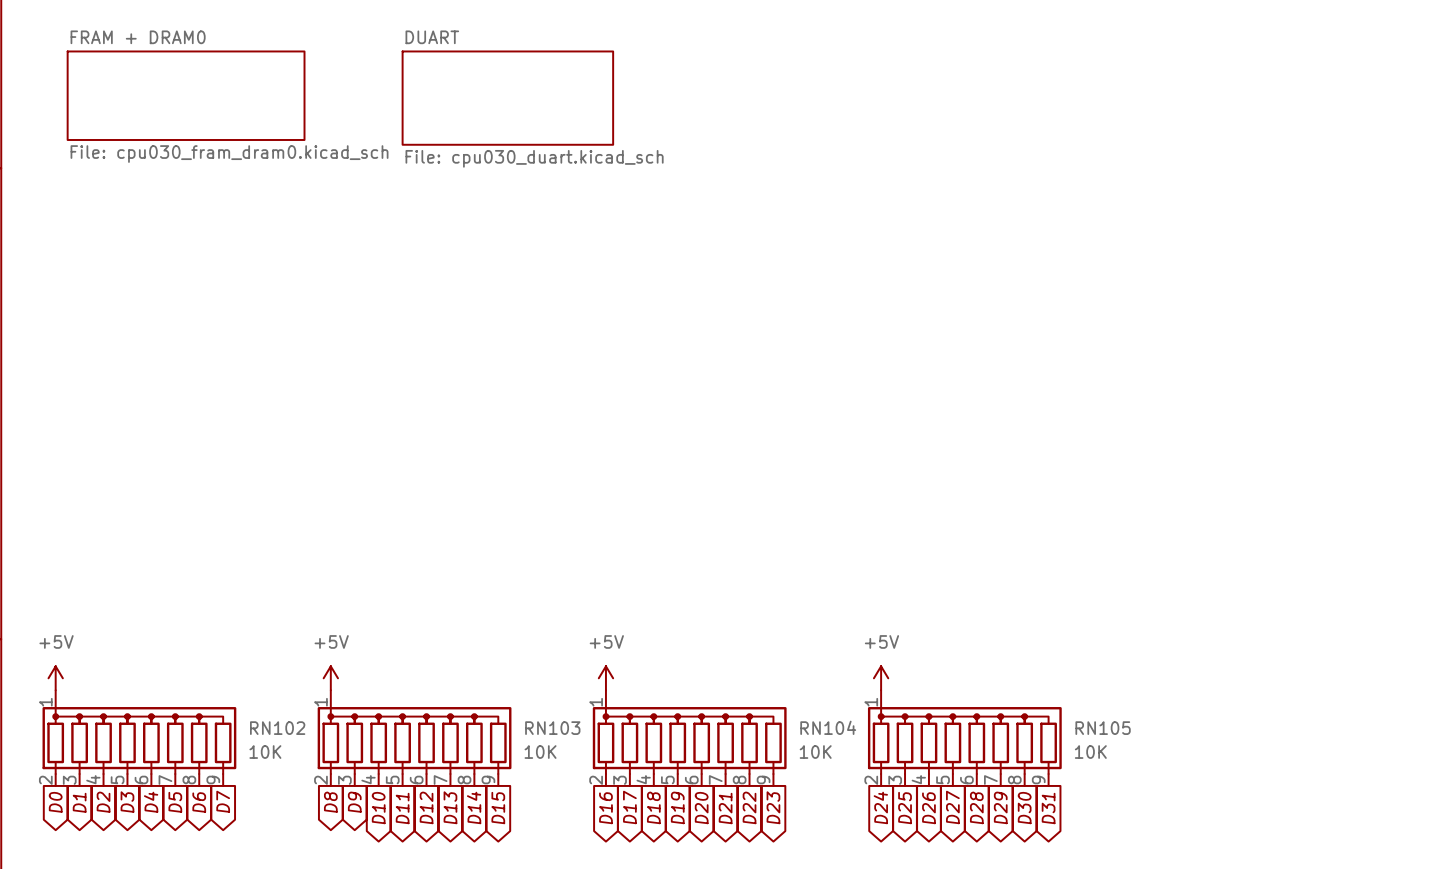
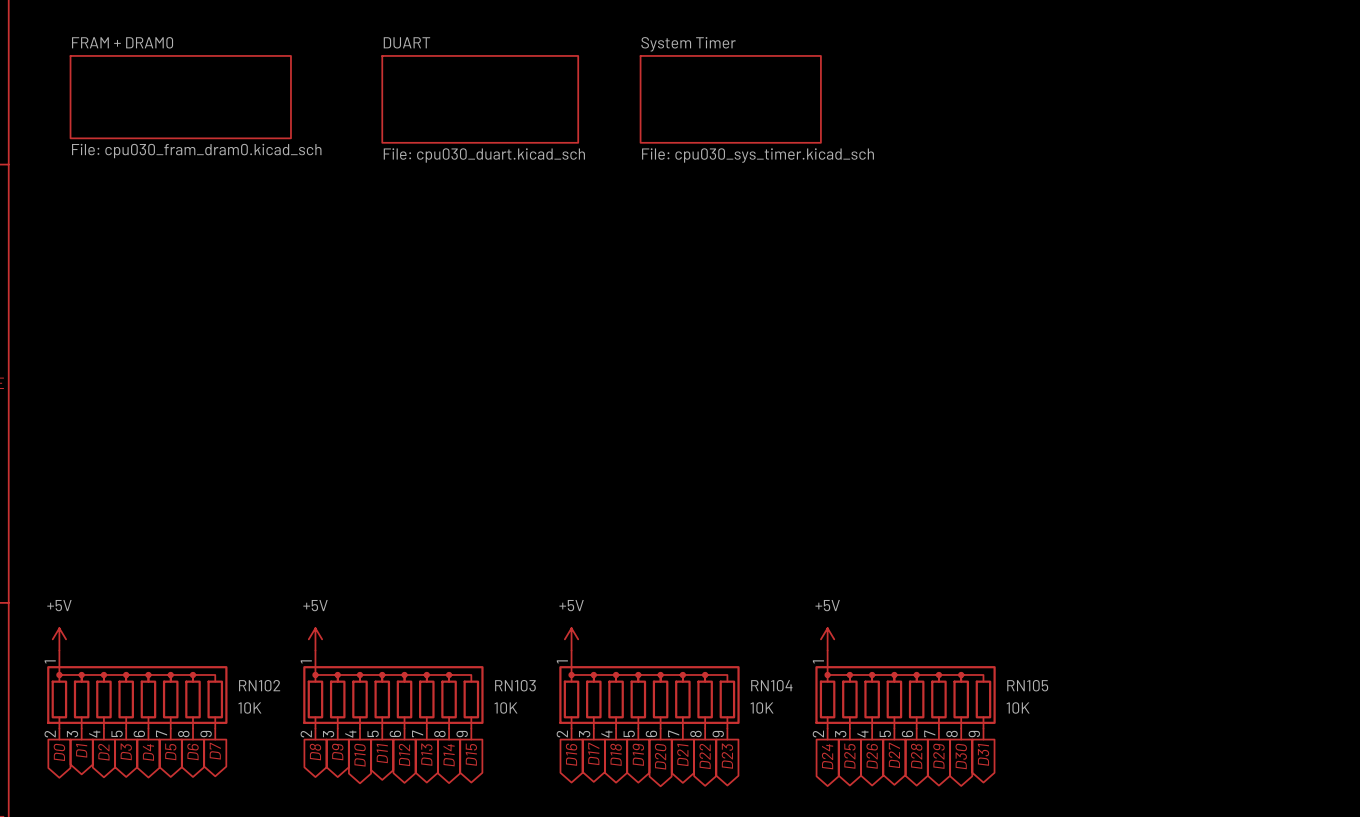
sheet System Timer: none -> File: cpu030_sys_timer.kicad_sch (730, 99)

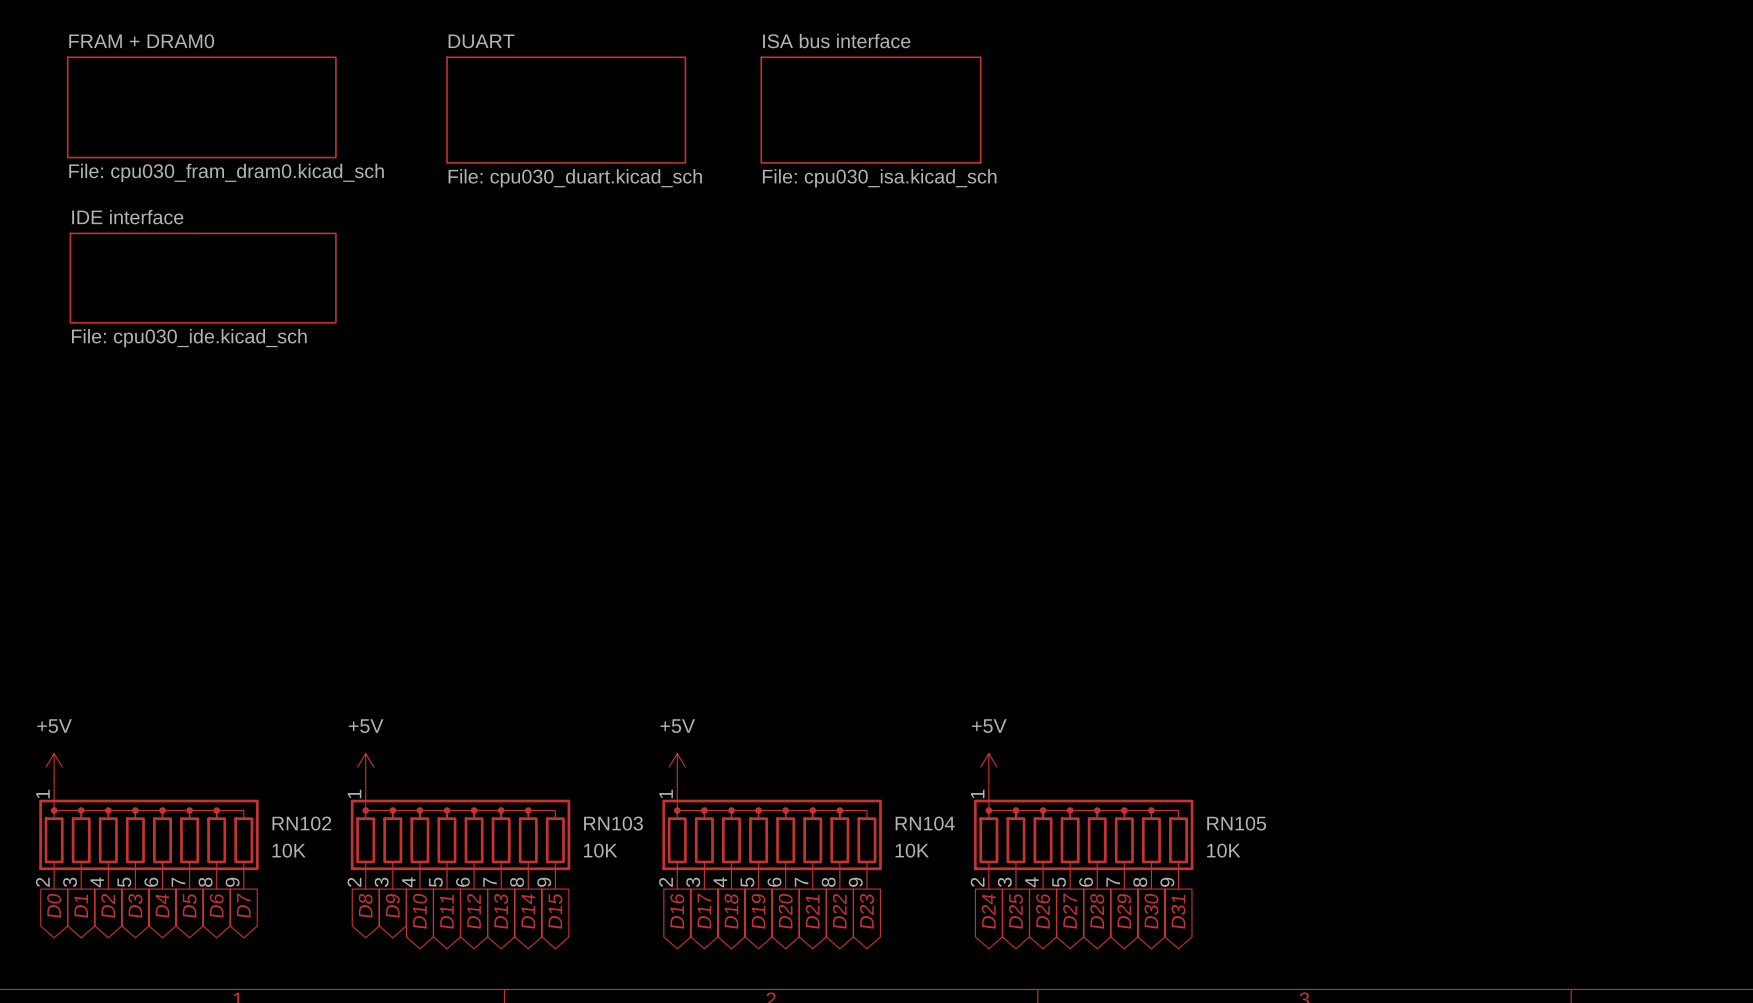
sheet System Timer name: System Timer (688, 44) -> ISA bus interface (836, 41)
sheet System Timer value: File: cpu030_sys_timer.kicad_sch (758, 155) -> File: cpu030_isa.kicad_sch (879, 178)
sheet IDE interface: none -> File: cpu030_ide.kicad_sch (203, 278)

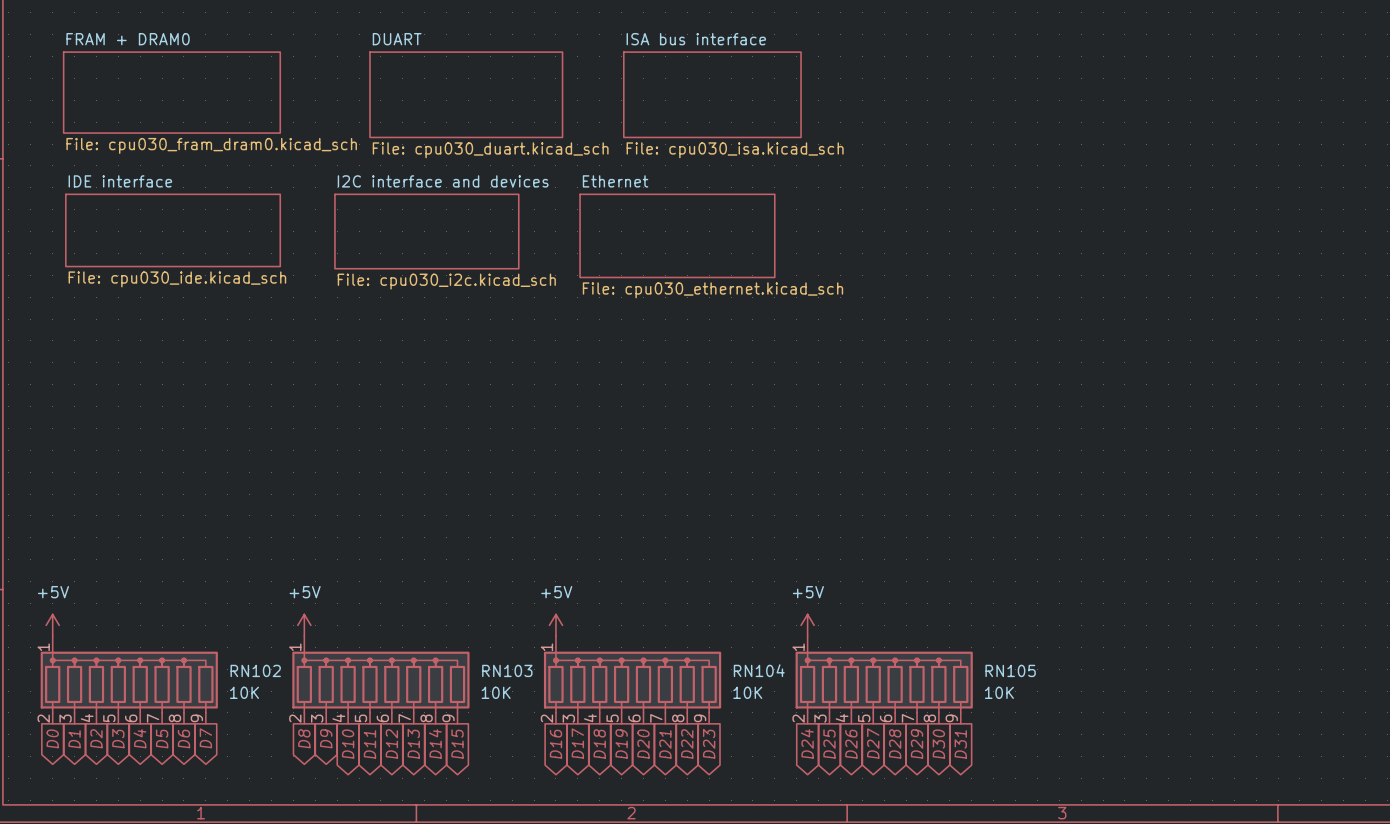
sheet I2C interface and devices: none -> File: cpu030_i2c.kicad_sch (426, 231)
sheet Ethernet: none -> File: cpu030_ethernet.kicad_sch (677, 235)

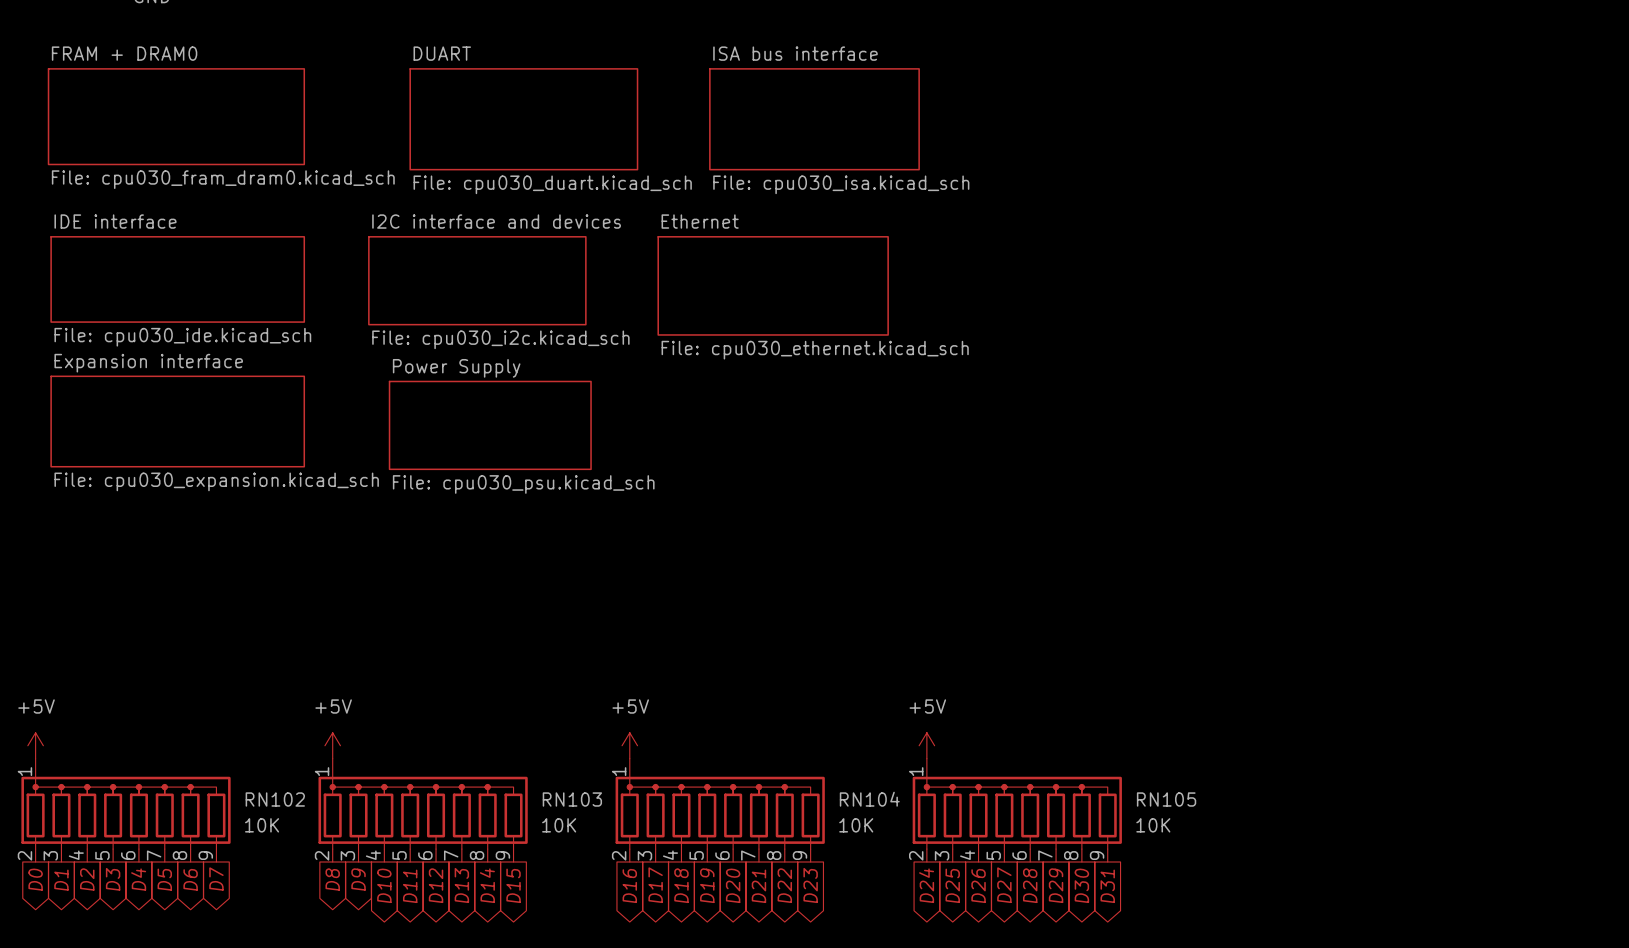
sheet Expansion interface: none -> File: cpu030_expansion.kicad_sch (177, 421)
sheet Power Supply: none -> File: cpu030_psu.kicad_sch (490, 425)

